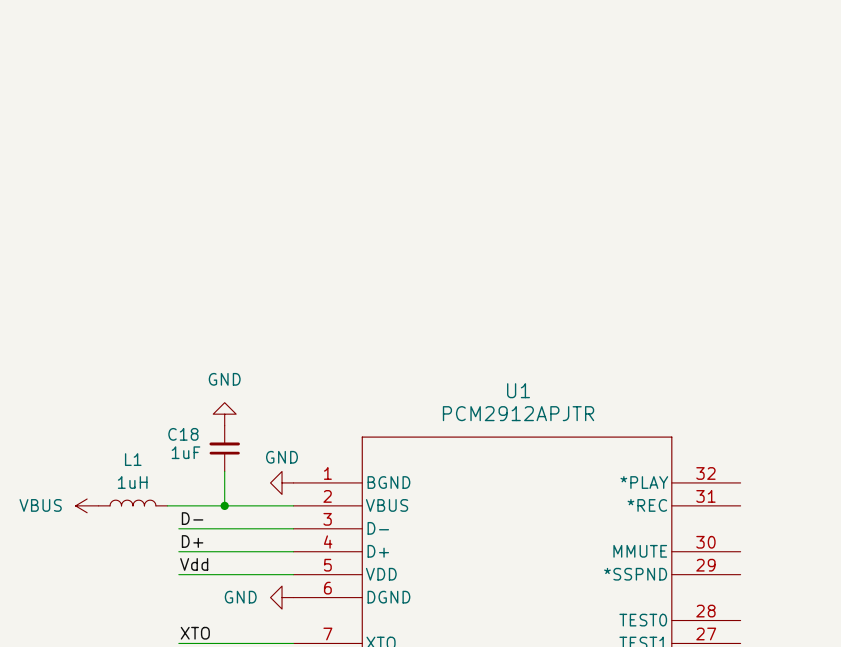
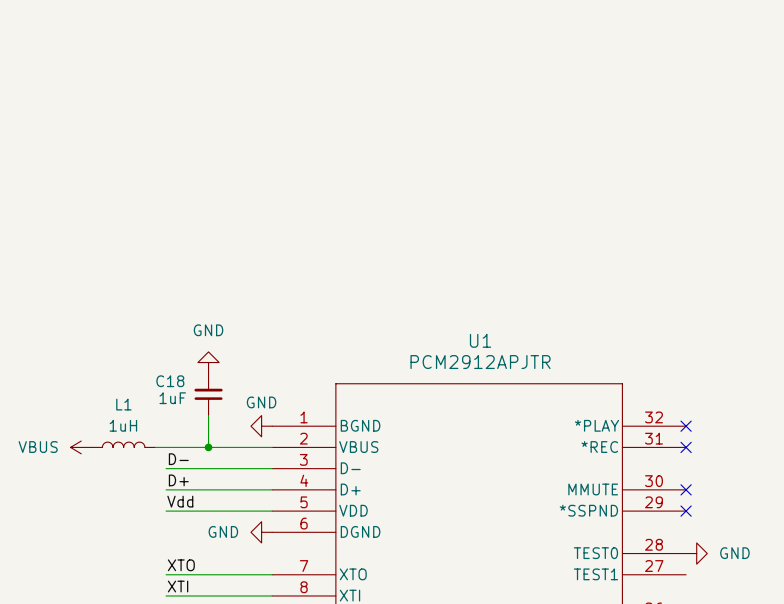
no-connect mark: none -> (686, 426)
no-connect mark: none -> (686, 447)
no-connect mark: none -> (686, 489)
no-connect mark: none -> (686, 511)
power symbol: none -> GND (696, 553)

